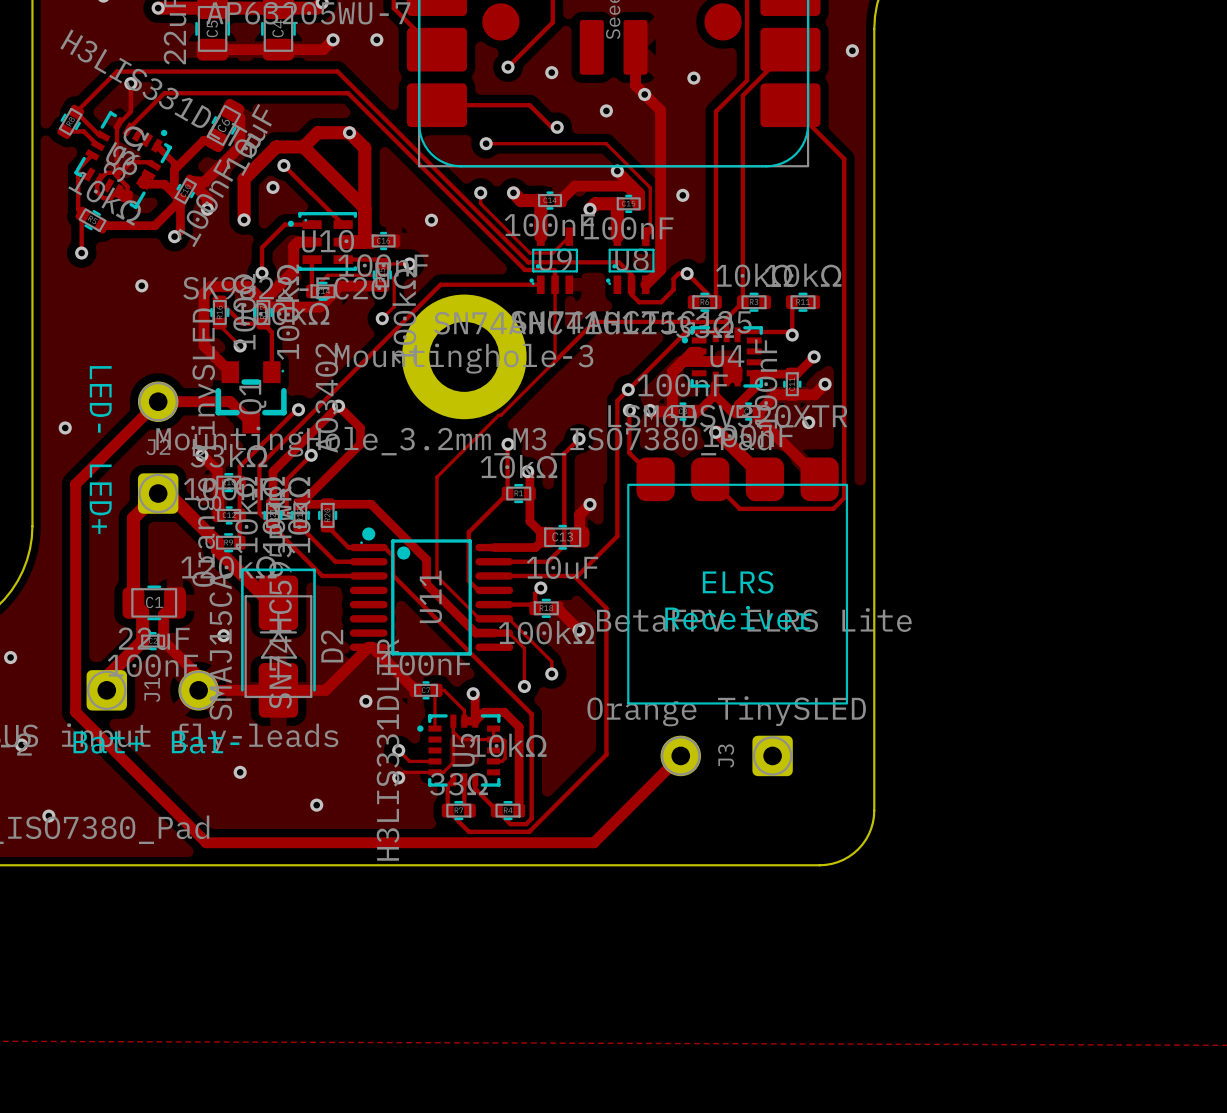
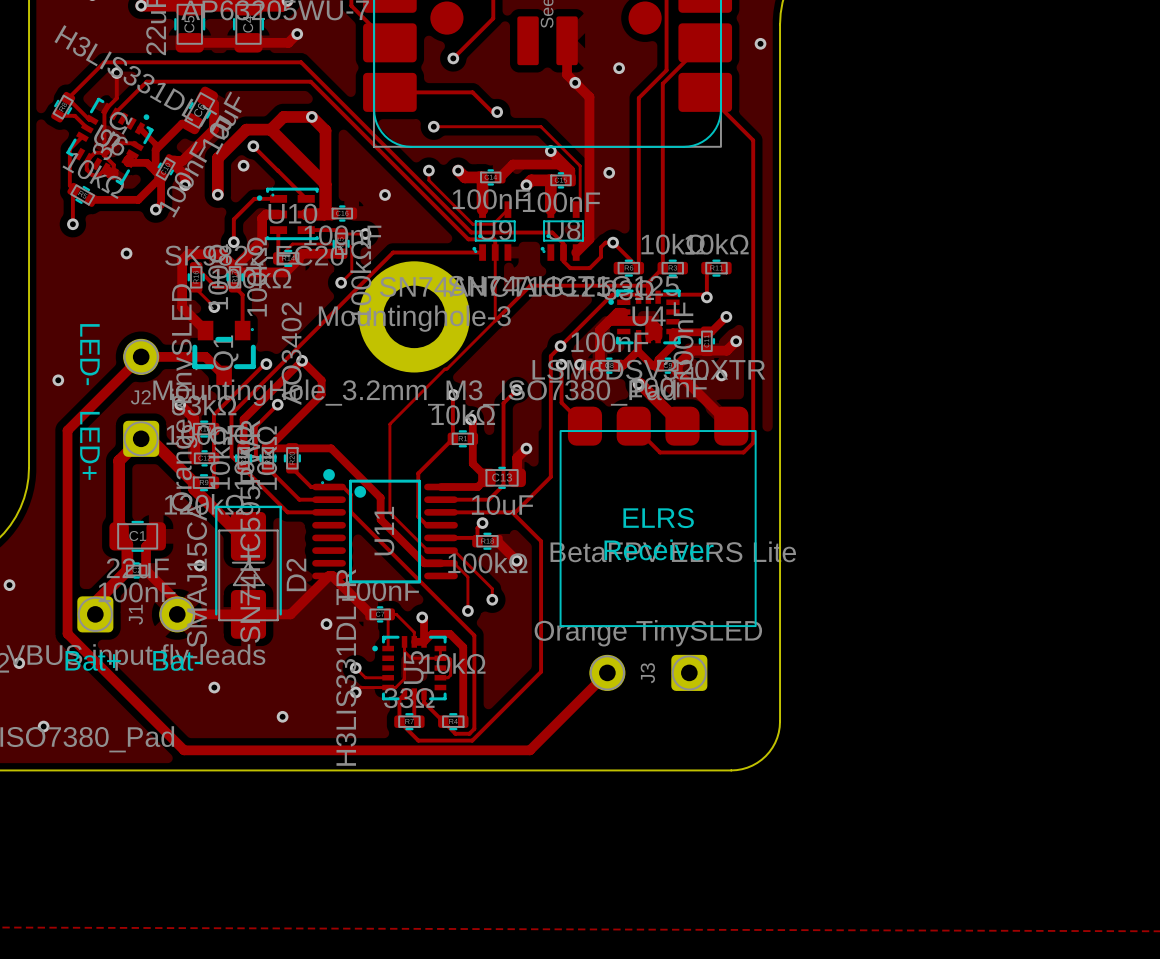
via: (376, 39) -> none
via: (551, 72) -> none
via: (606, 110) -> none

